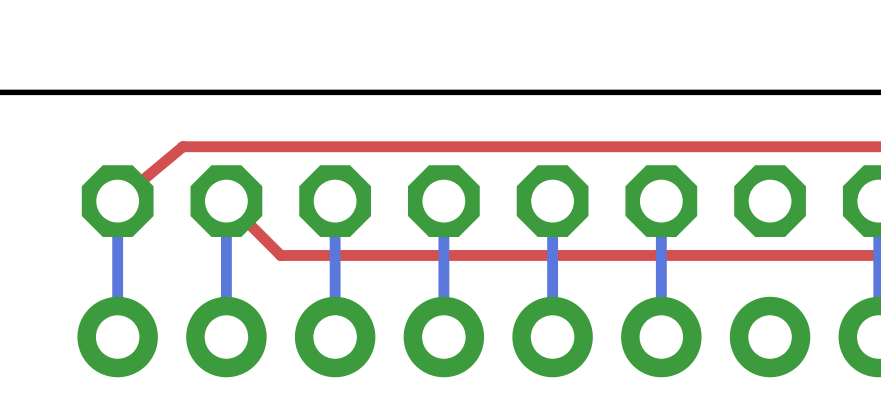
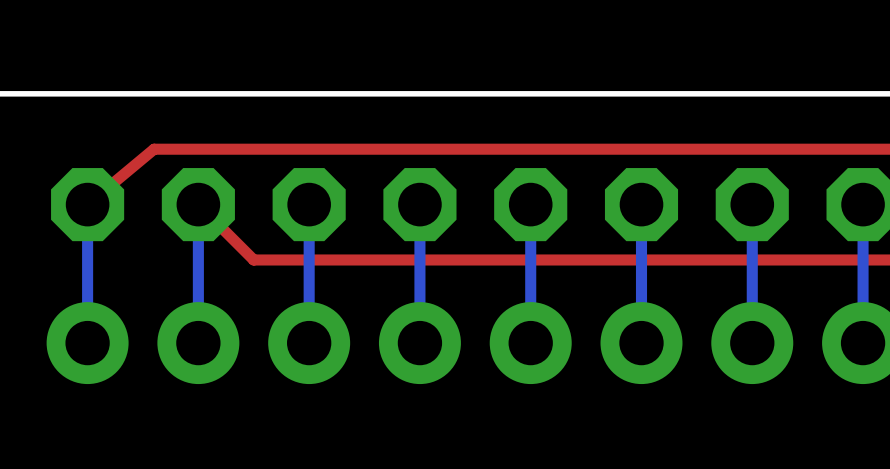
bottom track: none -> (752, 204) (752, 343)

